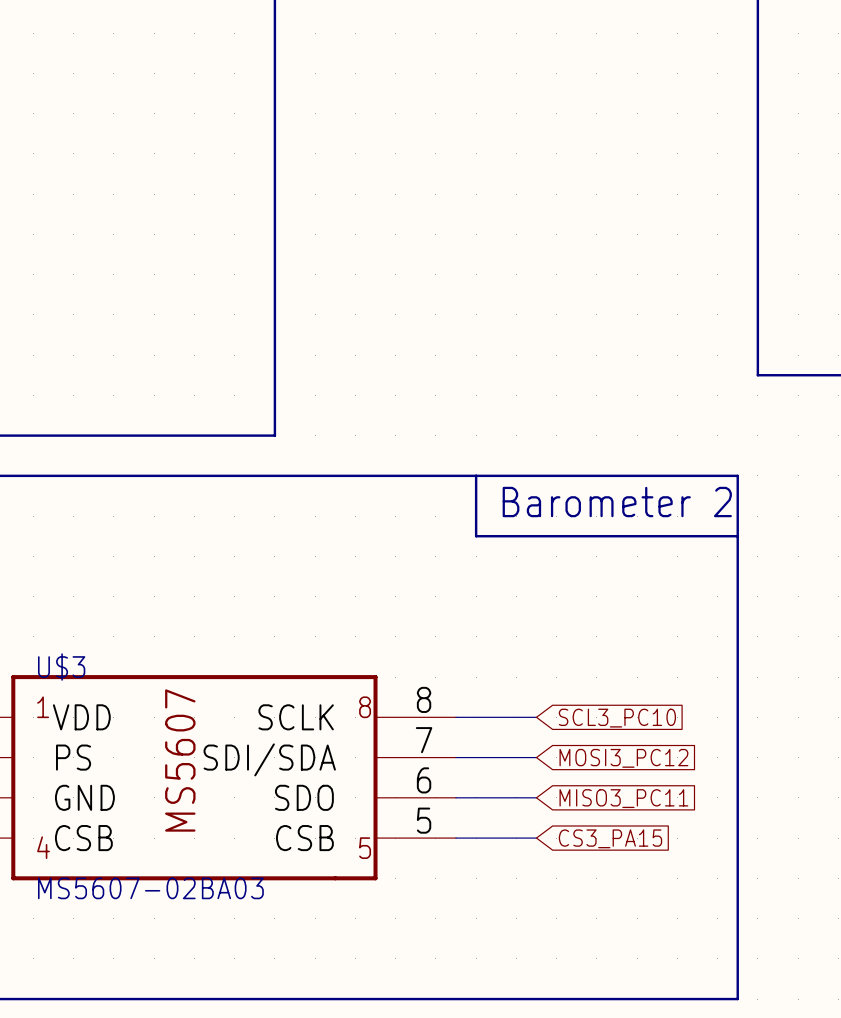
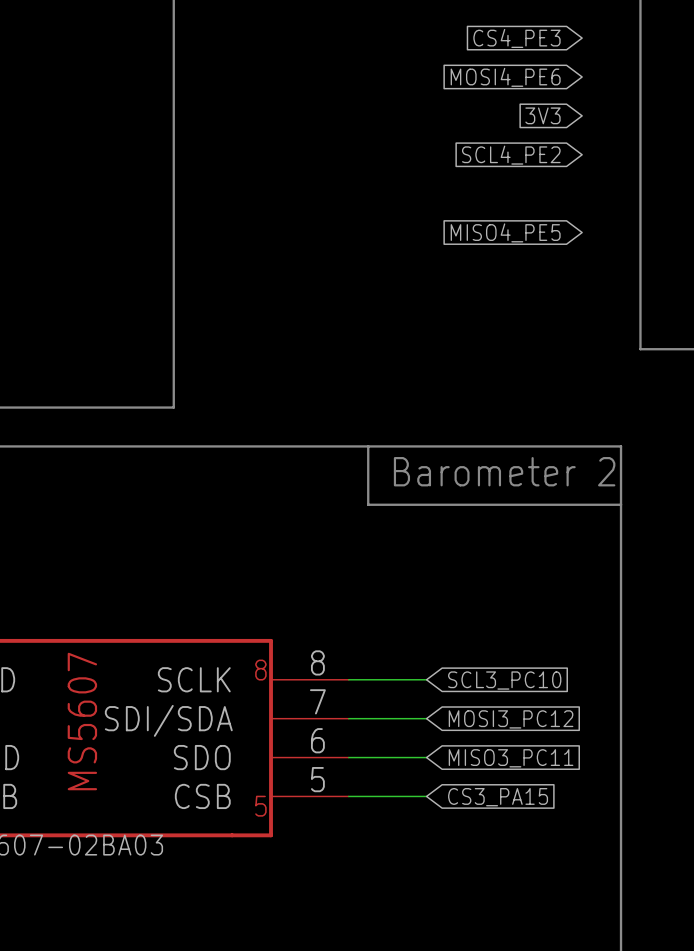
global label: none -> CS4_PE3 (516, 38)
global label: none -> MOSI4_PE6 (505, 77)
global label: none -> 3V3 (542, 115)
global label: none -> SCL4_PE2 (511, 155)
global label: none -> MISO4_PE5 (505, 232)

